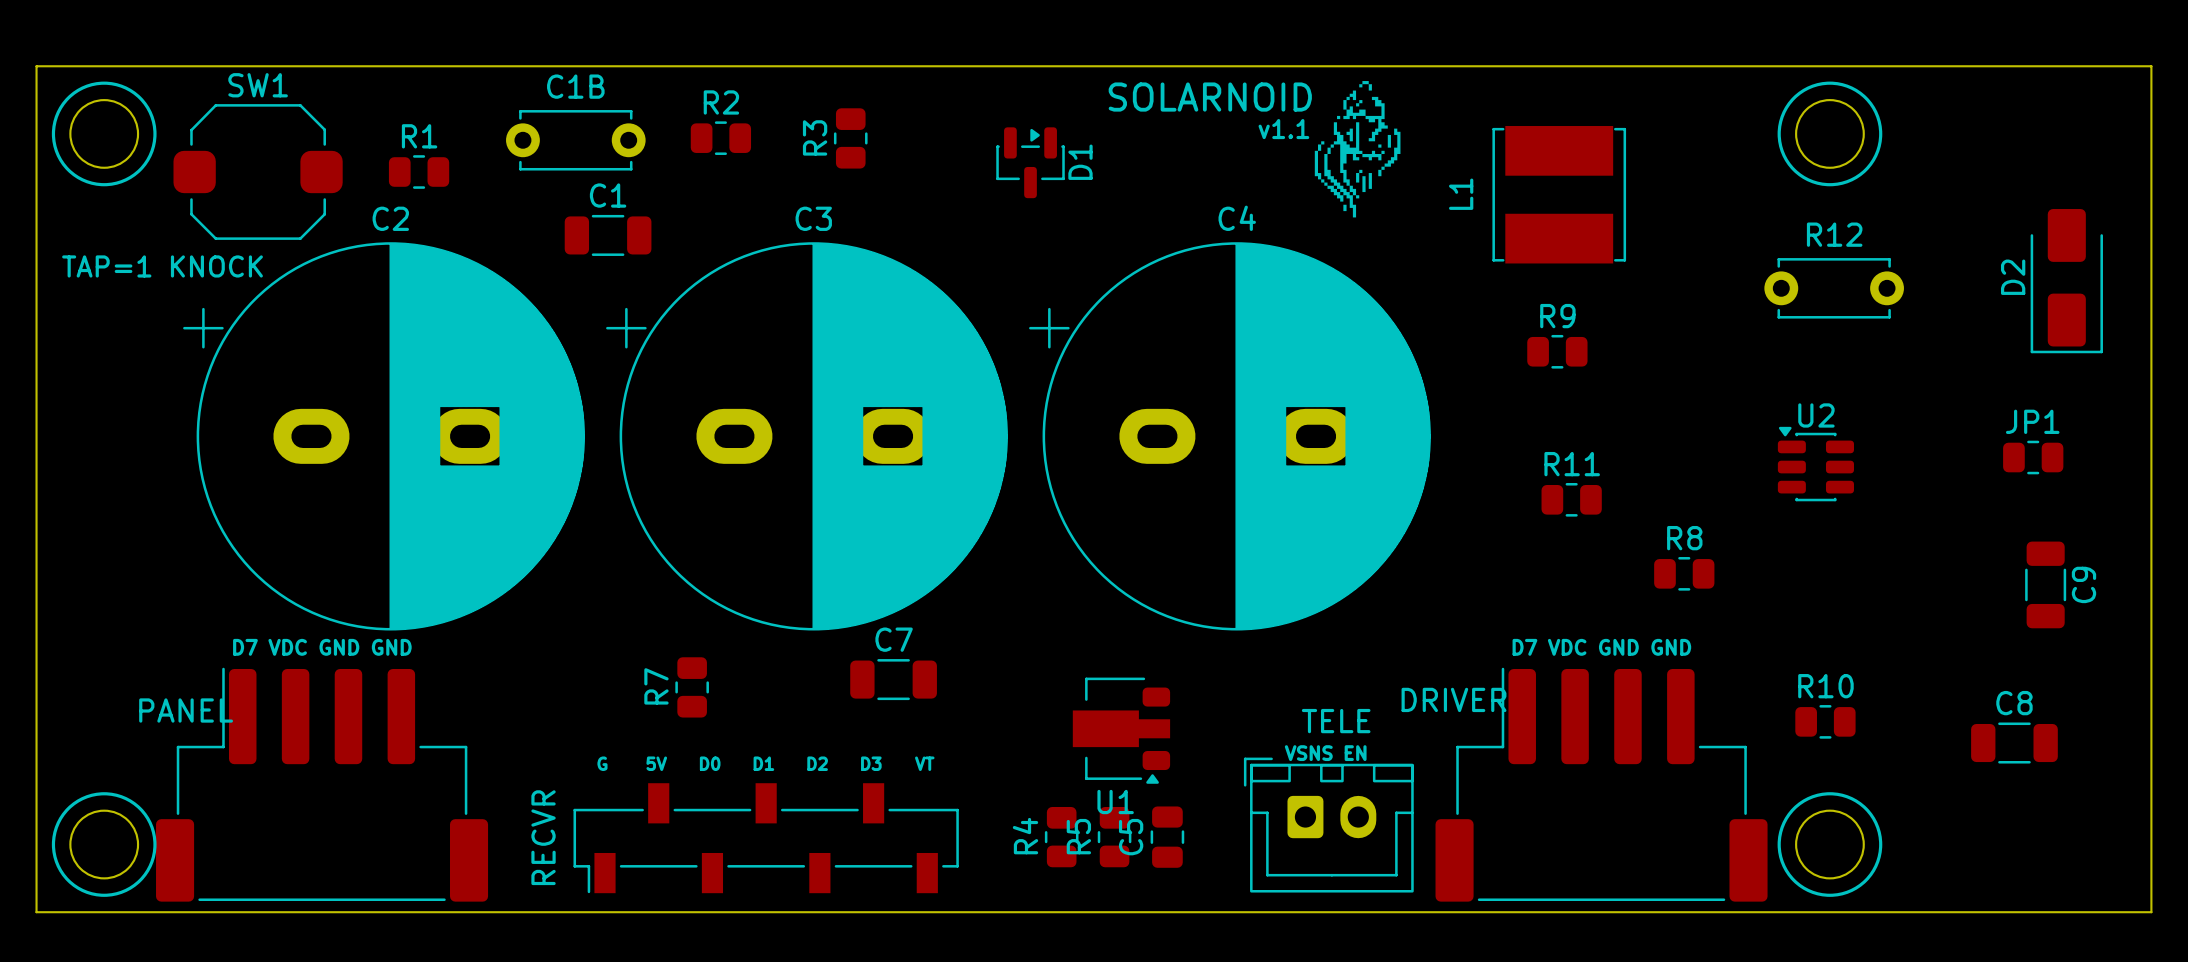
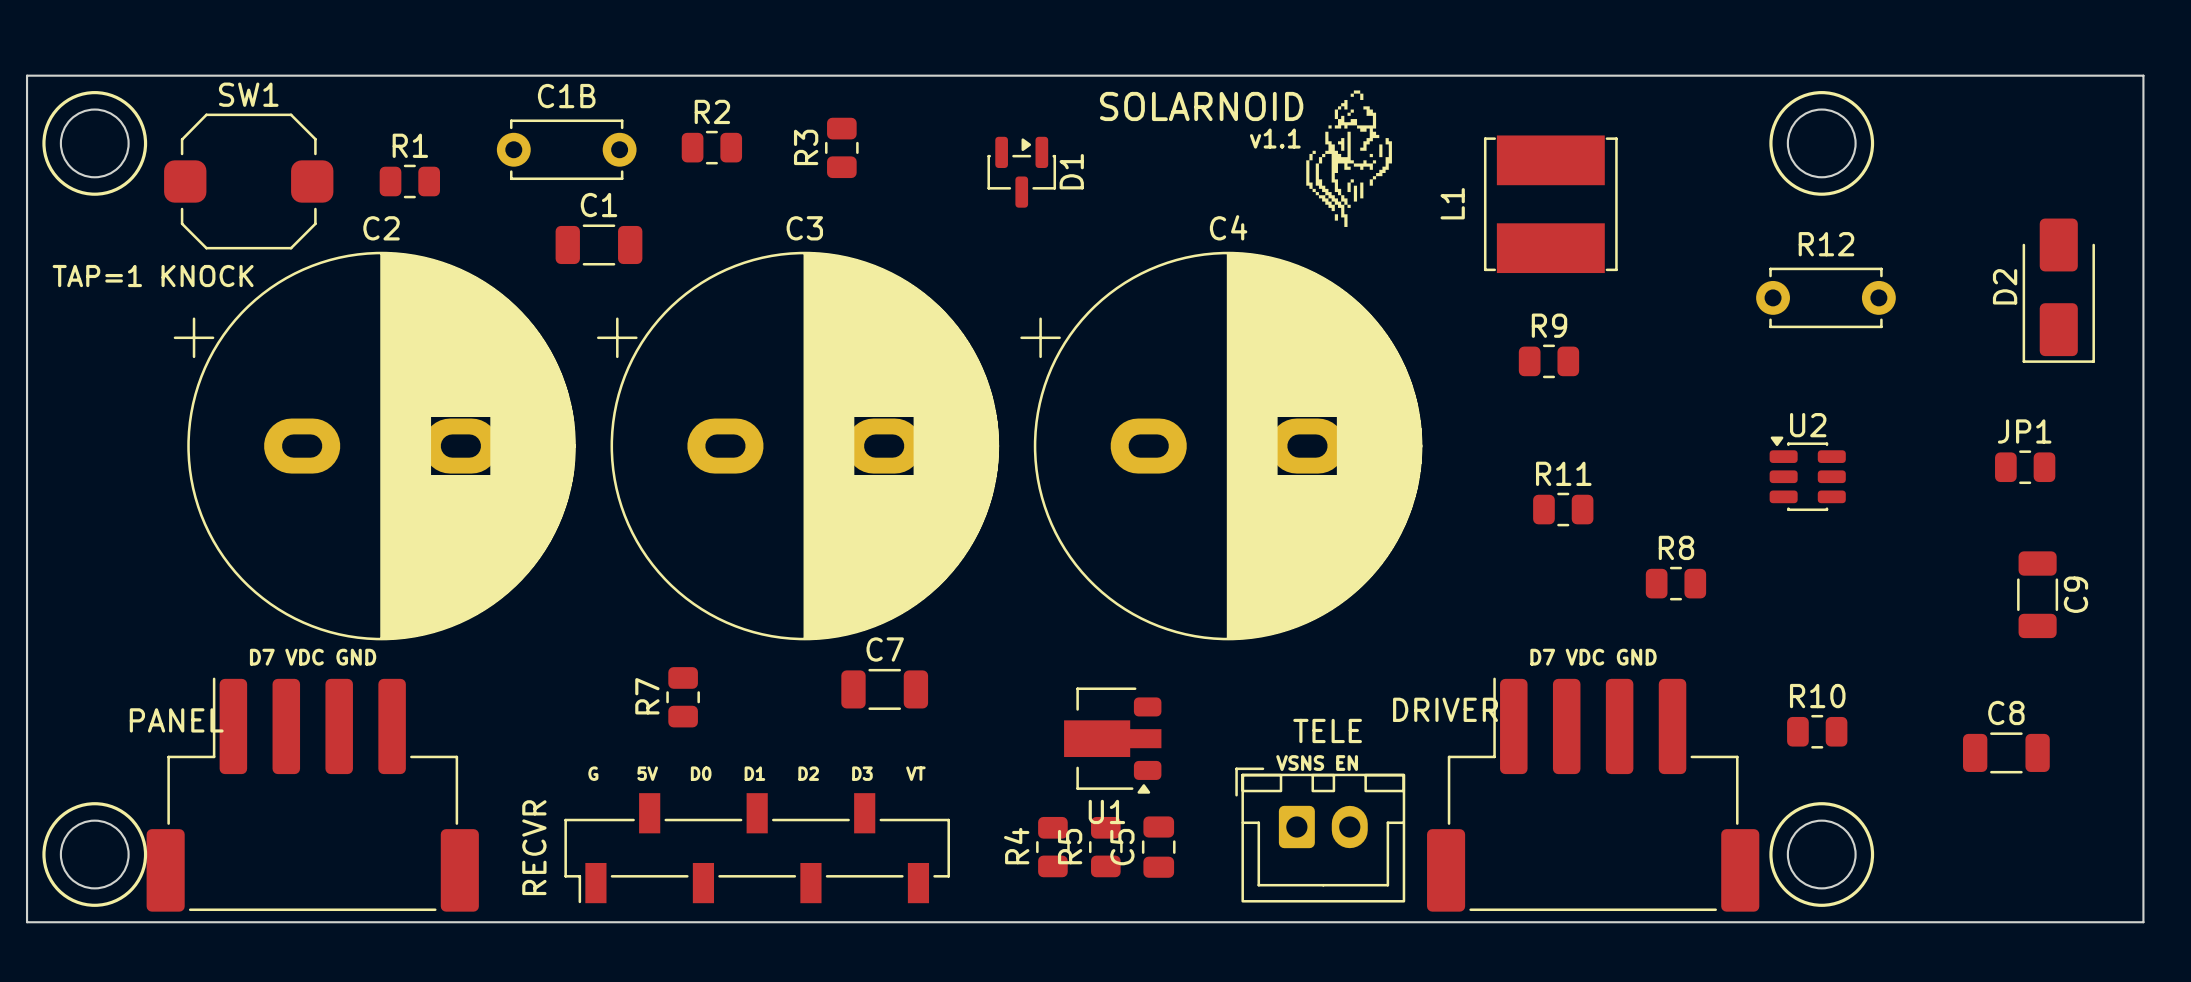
text: D7 VDC GND GND (322, 647) -> D7 VDC GND (313, 657)
text: D7 VDC GND GND (1601, 647) -> D7 VDC GND (1593, 657)

